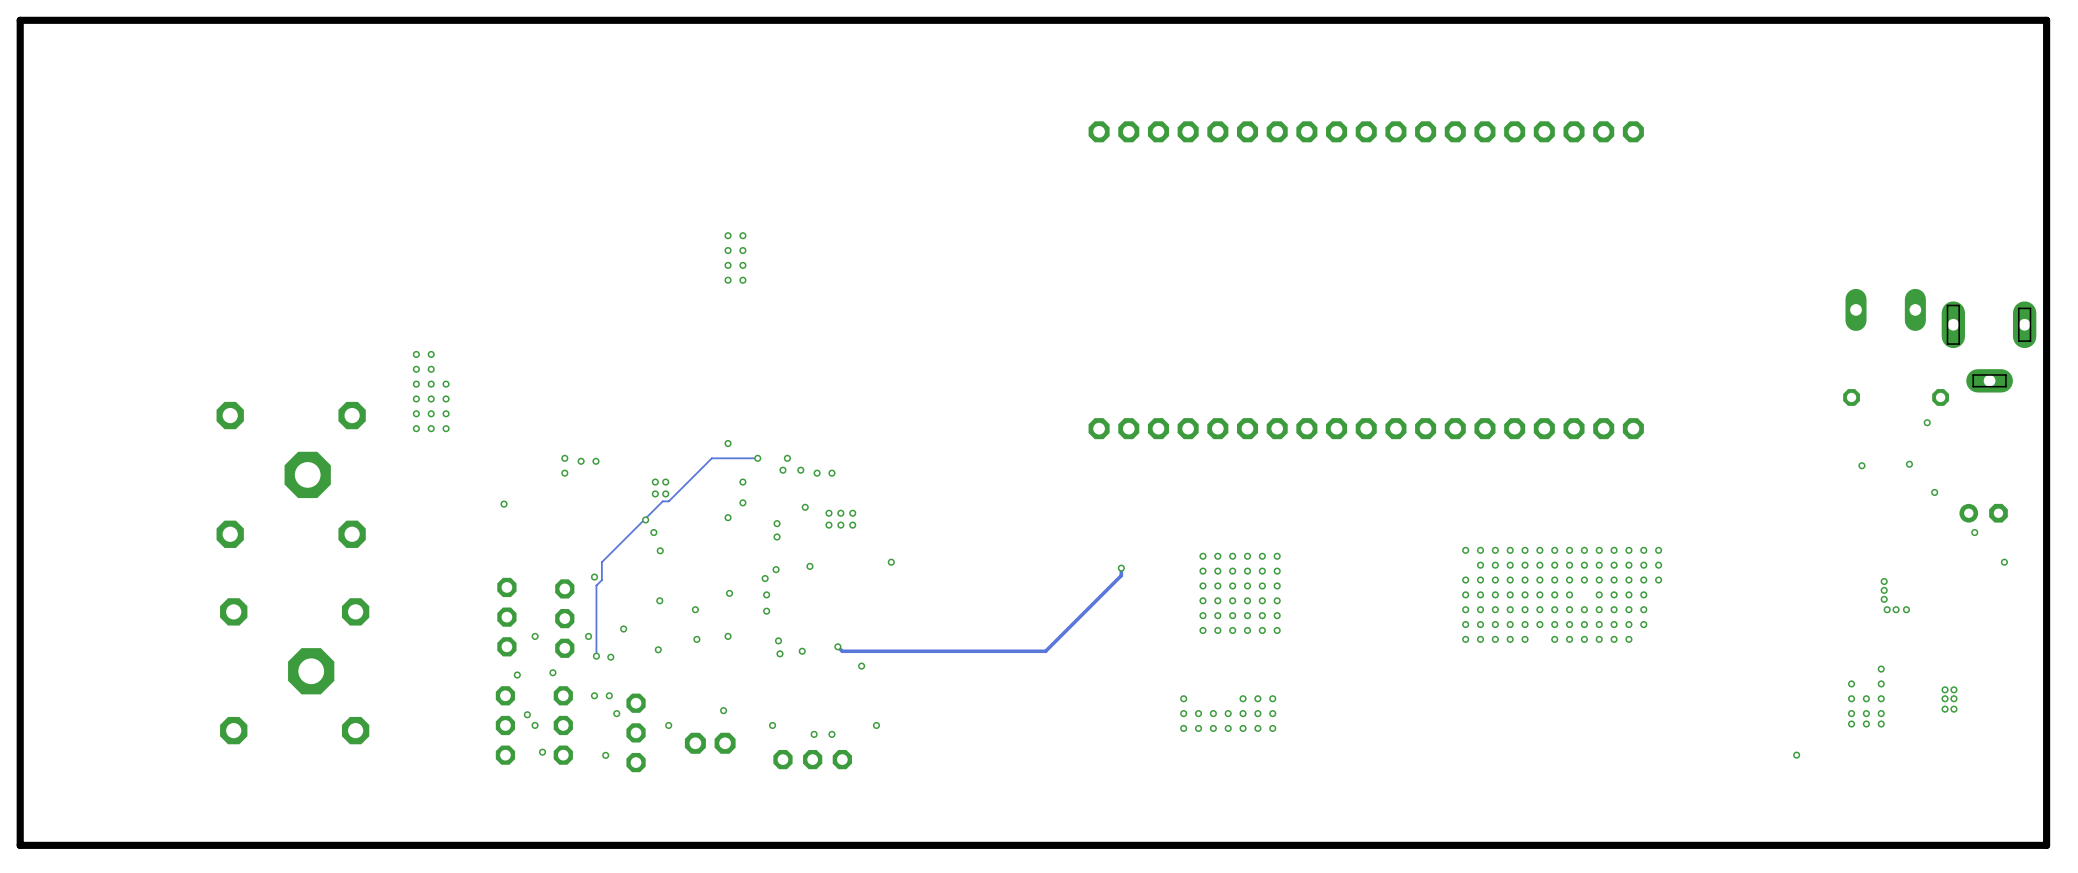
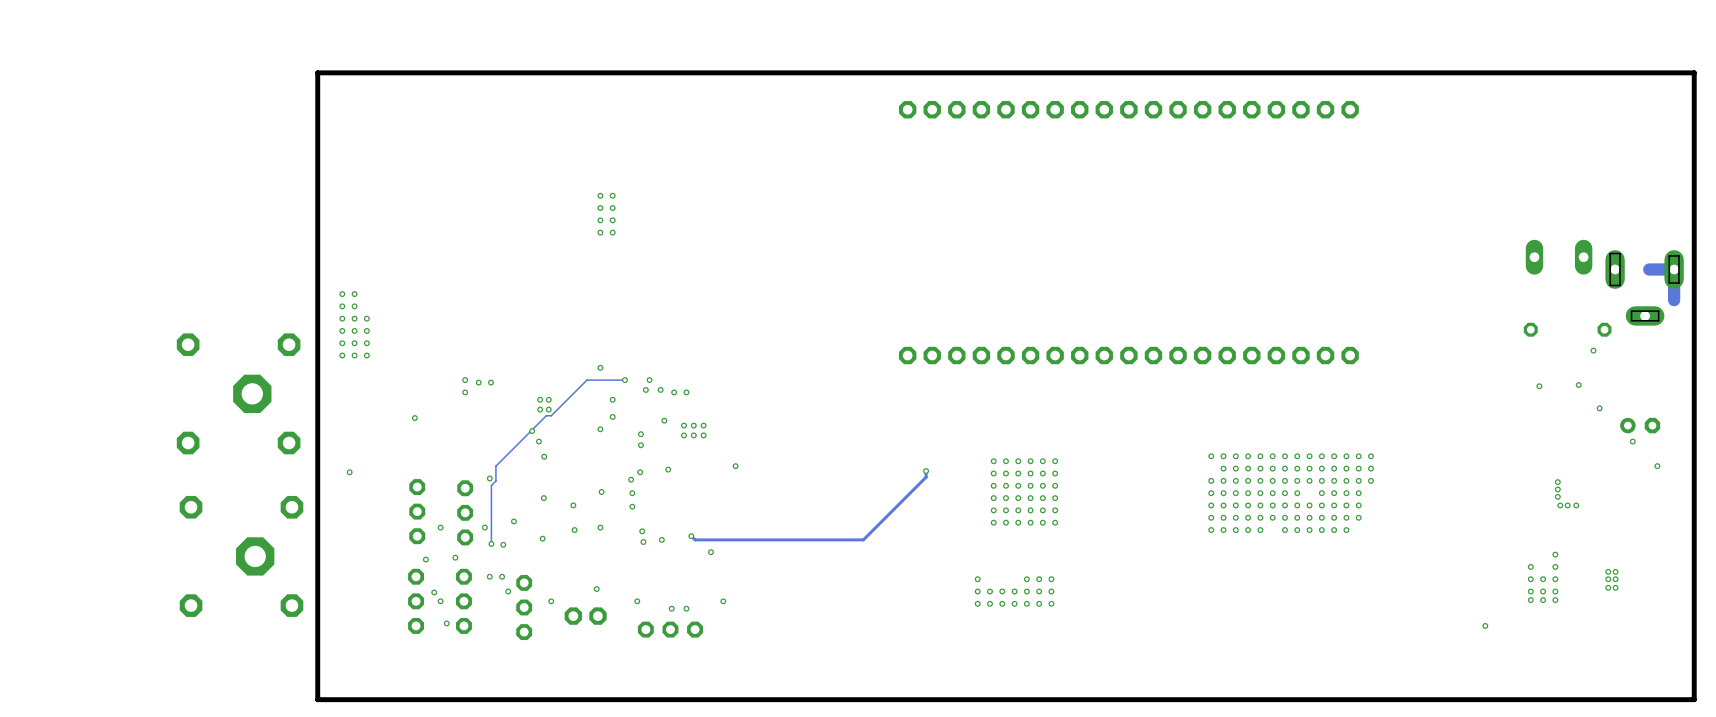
board edge: (2046, 20) (2046, 845) (20, 845) (20, 20) (2046, 20) -> (1694, 72) (1694, 699) (317, 699) (317, 72) (1694, 72)
track: none -> (1649, 269) (1674, 269) (1674, 300)
via: none -> (349, 472)
via: (605, 755) -> none

